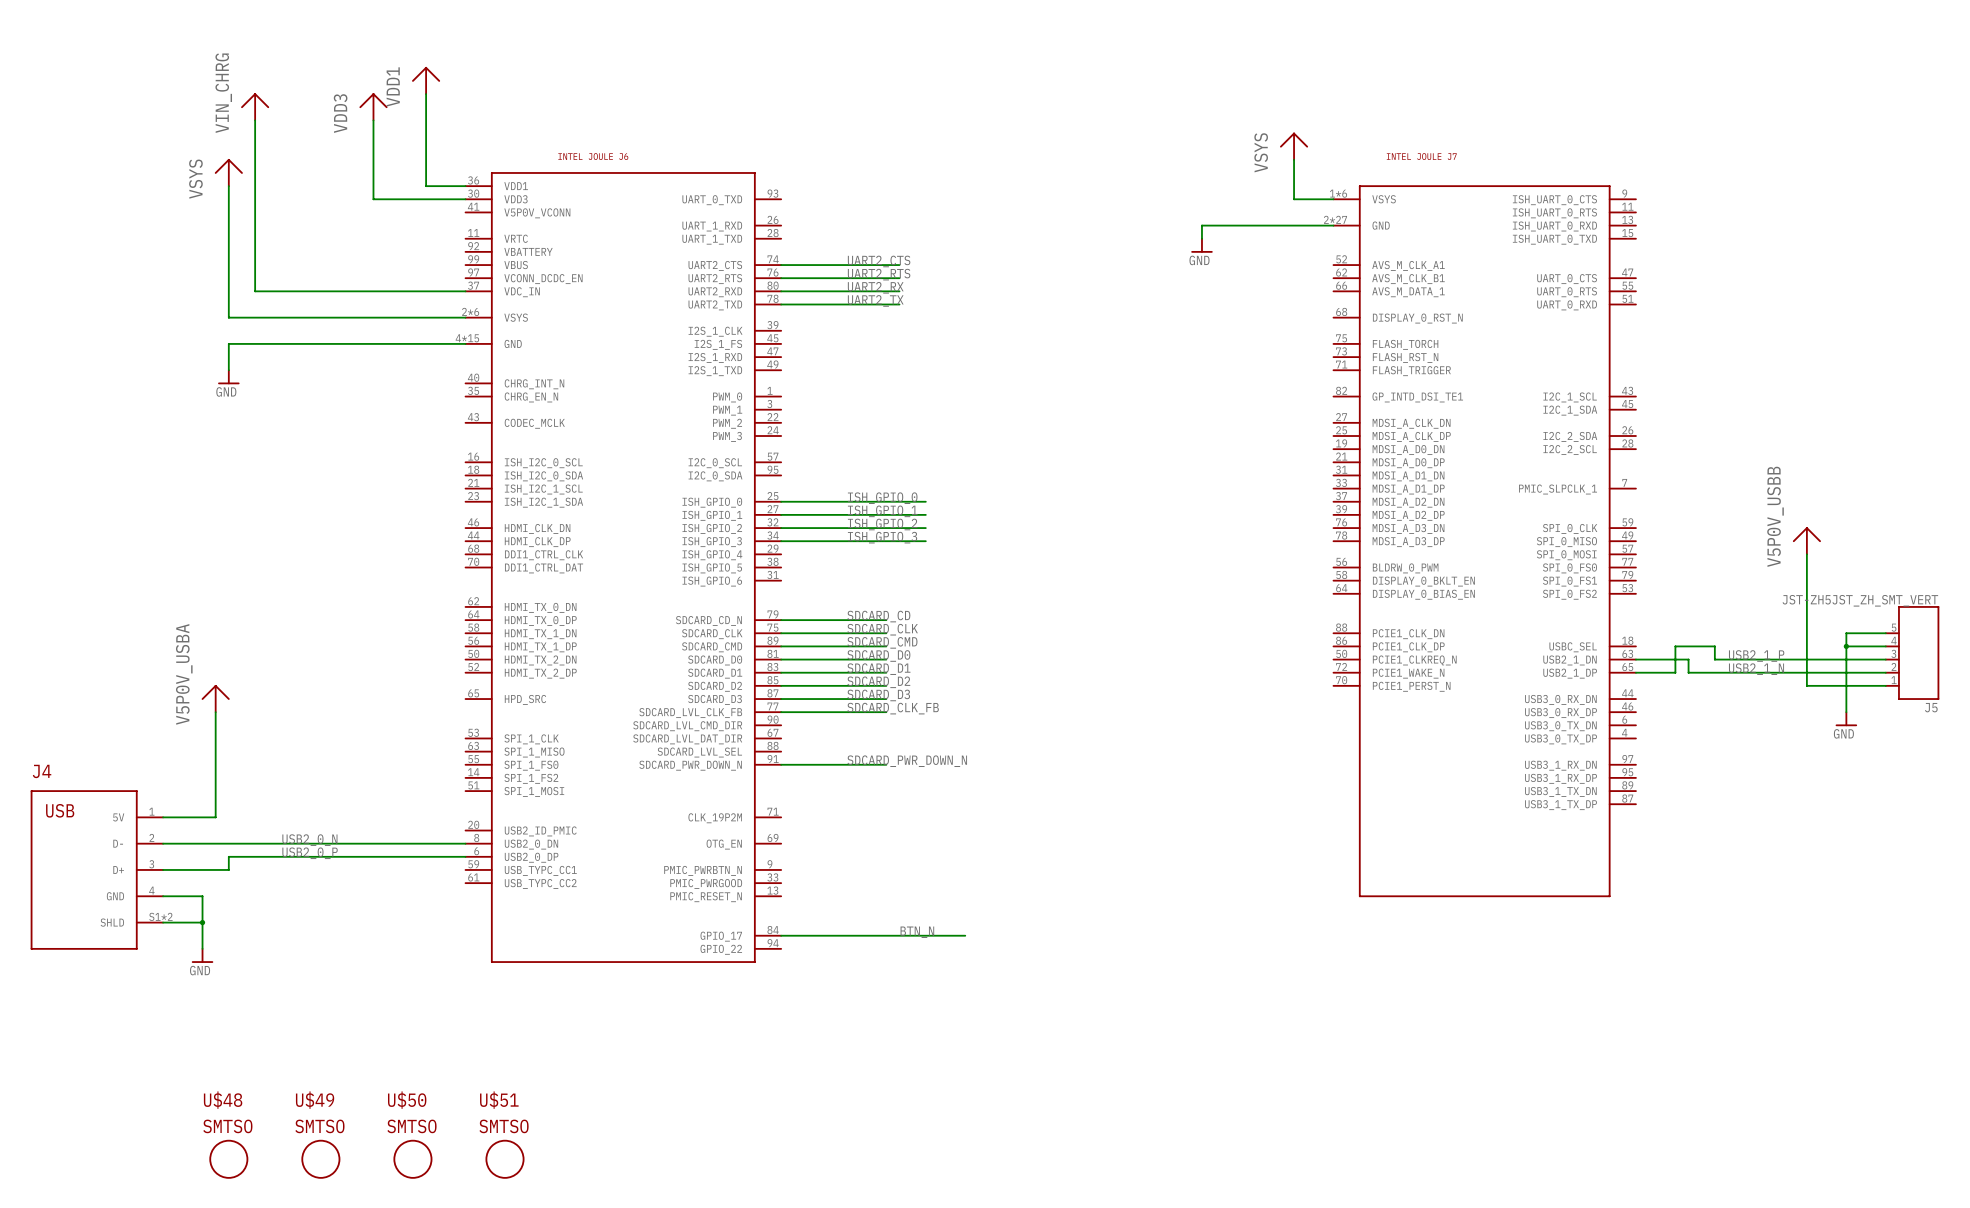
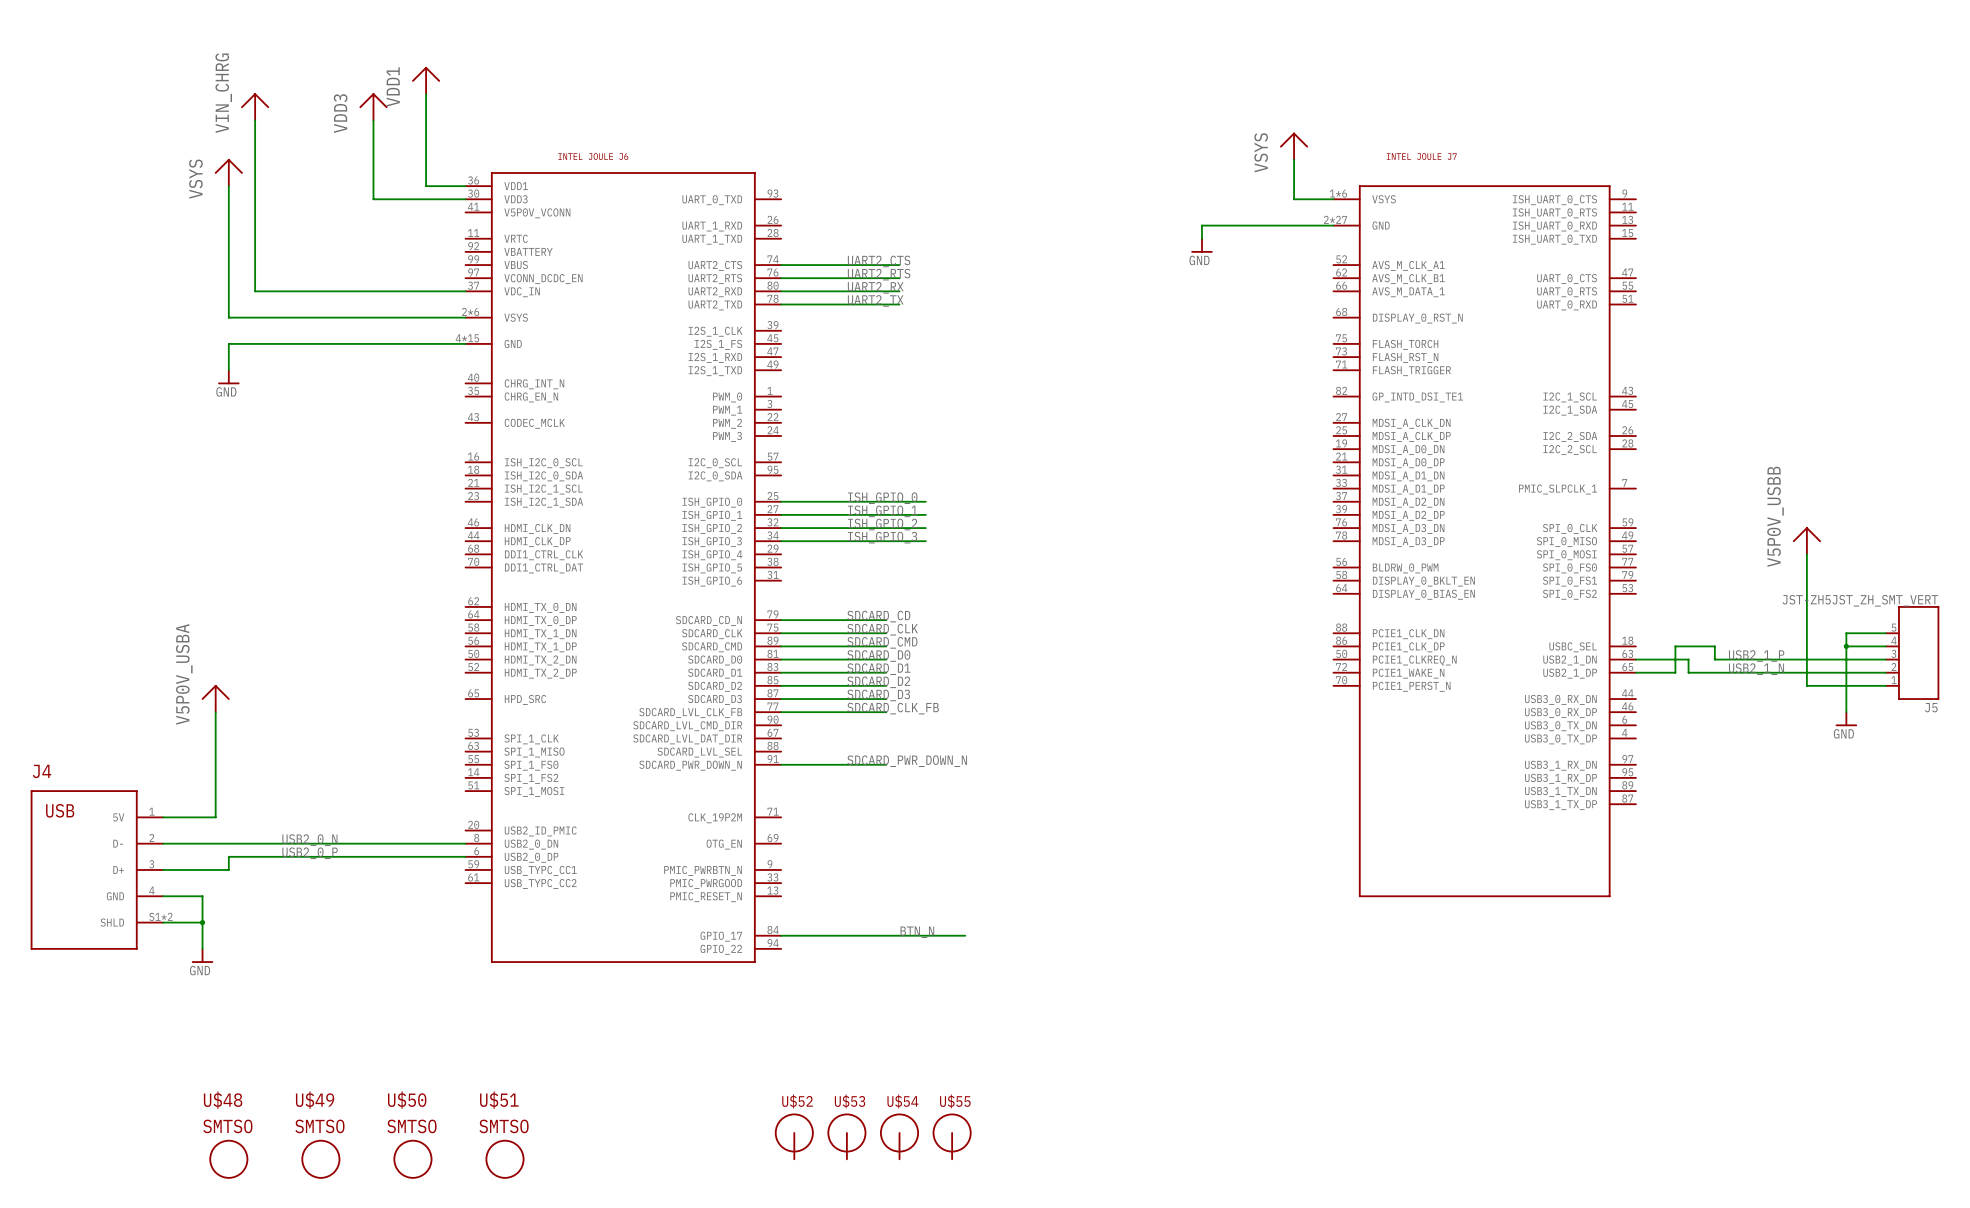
U$52: none -> (794, 1136)
U$53: none -> (846, 1136)
U$54: none -> (899, 1136)
U$55: none -> (952, 1136)

